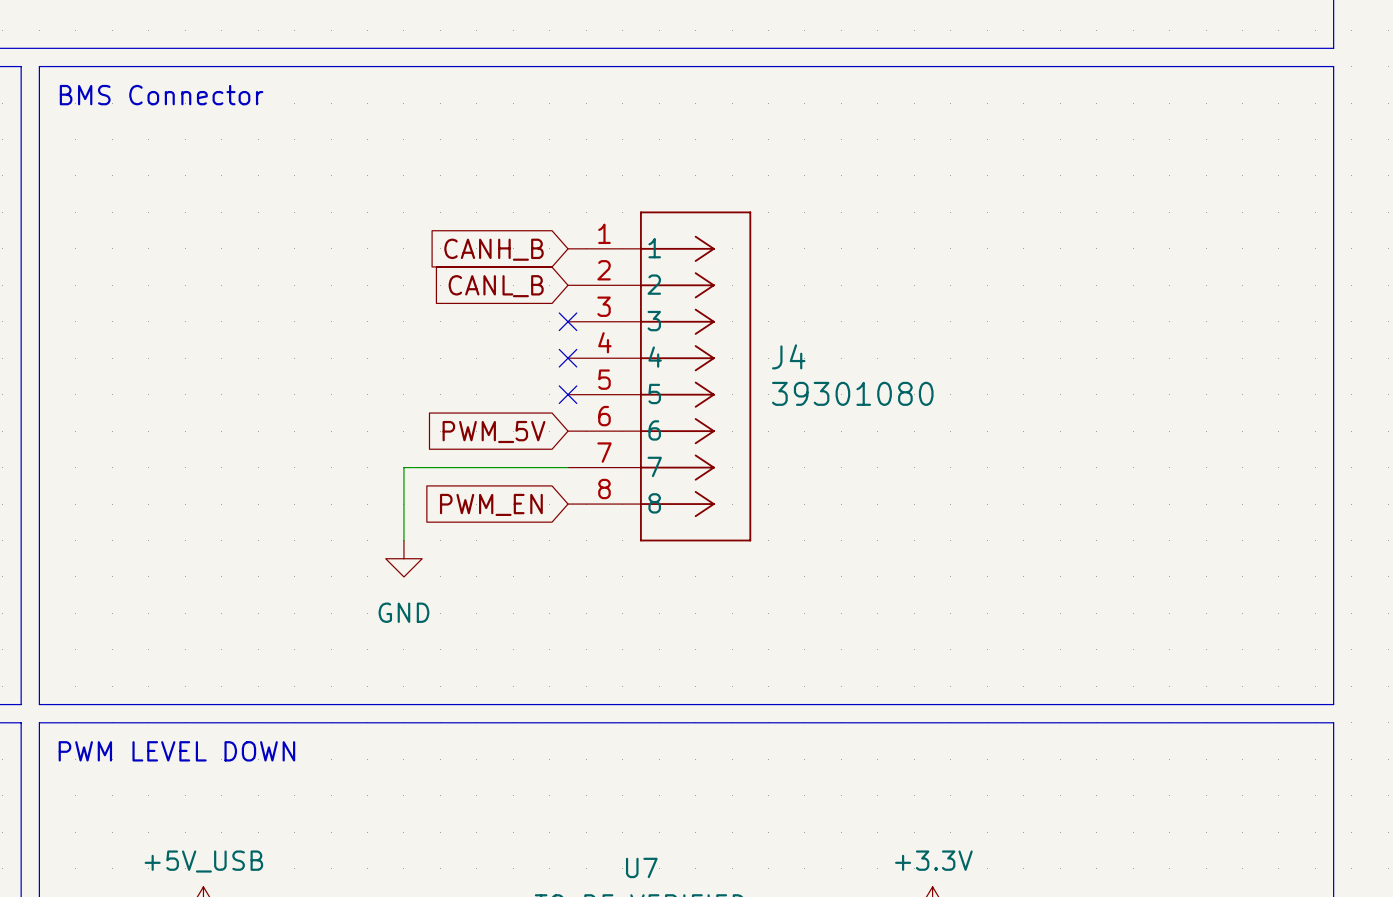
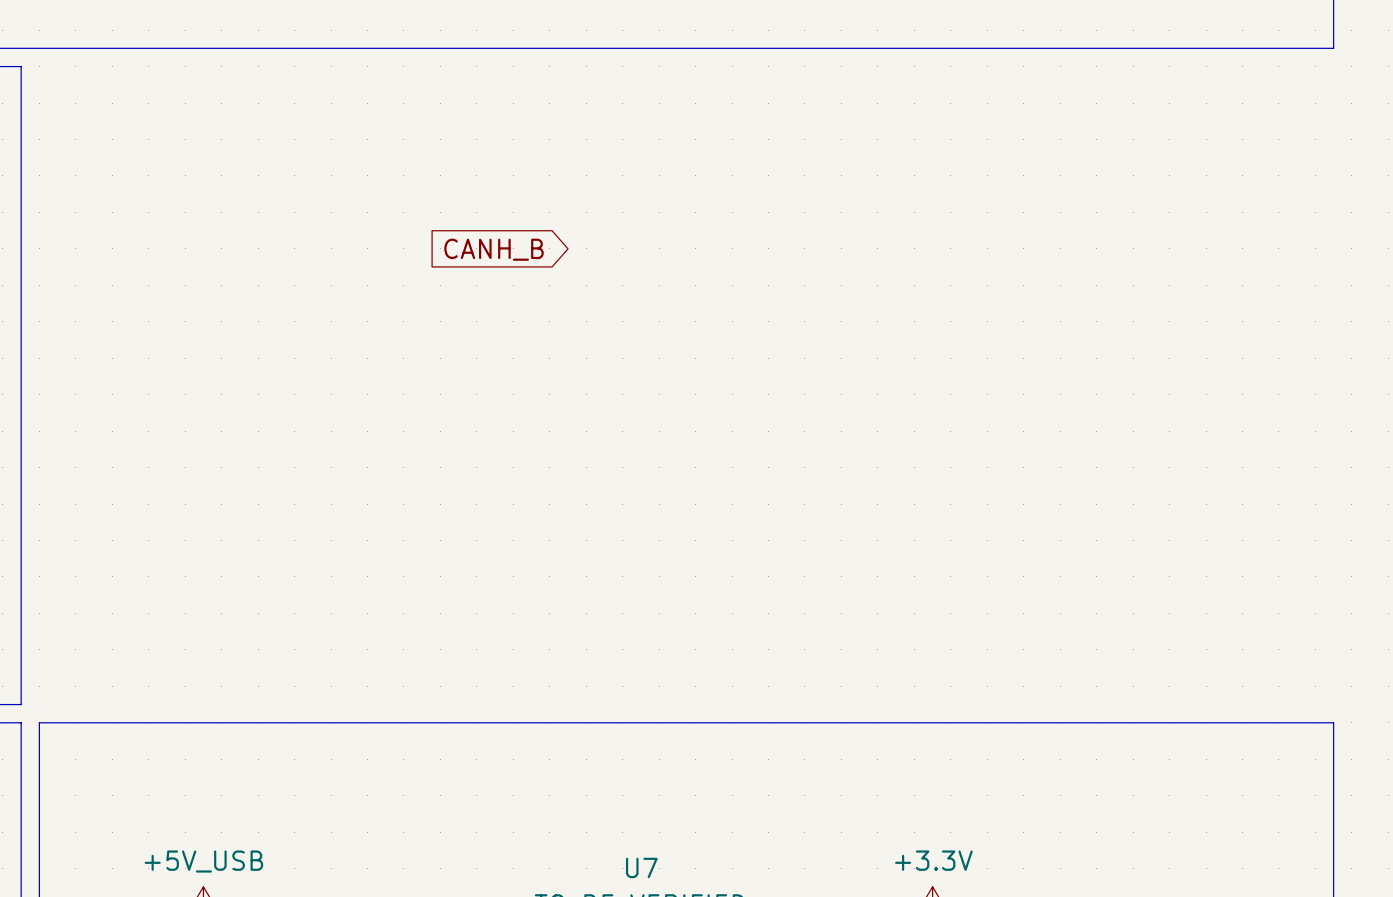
line: (39, 66) (1333, 66) (1333, 704) (39, 704) (39, 66) -> none
text: BMS Connector (161, 95) -> none
global label: CANL_B (496, 286) -> none
no-connect mark: (568, 321) -> none
no-connect mark: (568, 358) -> none
J4: 39301080 (659, 376) -> none
no-connect mark: (568, 394) -> none
global label: PWM_5V (493, 432) -> none
wire: (568, 467) (403, 467) (403, 540) -> none
global label: PWM_EN (491, 504) -> none
power symbol: GND (403, 558) -> none
text: PWM LEVEL DOWN (176, 751) -> none

